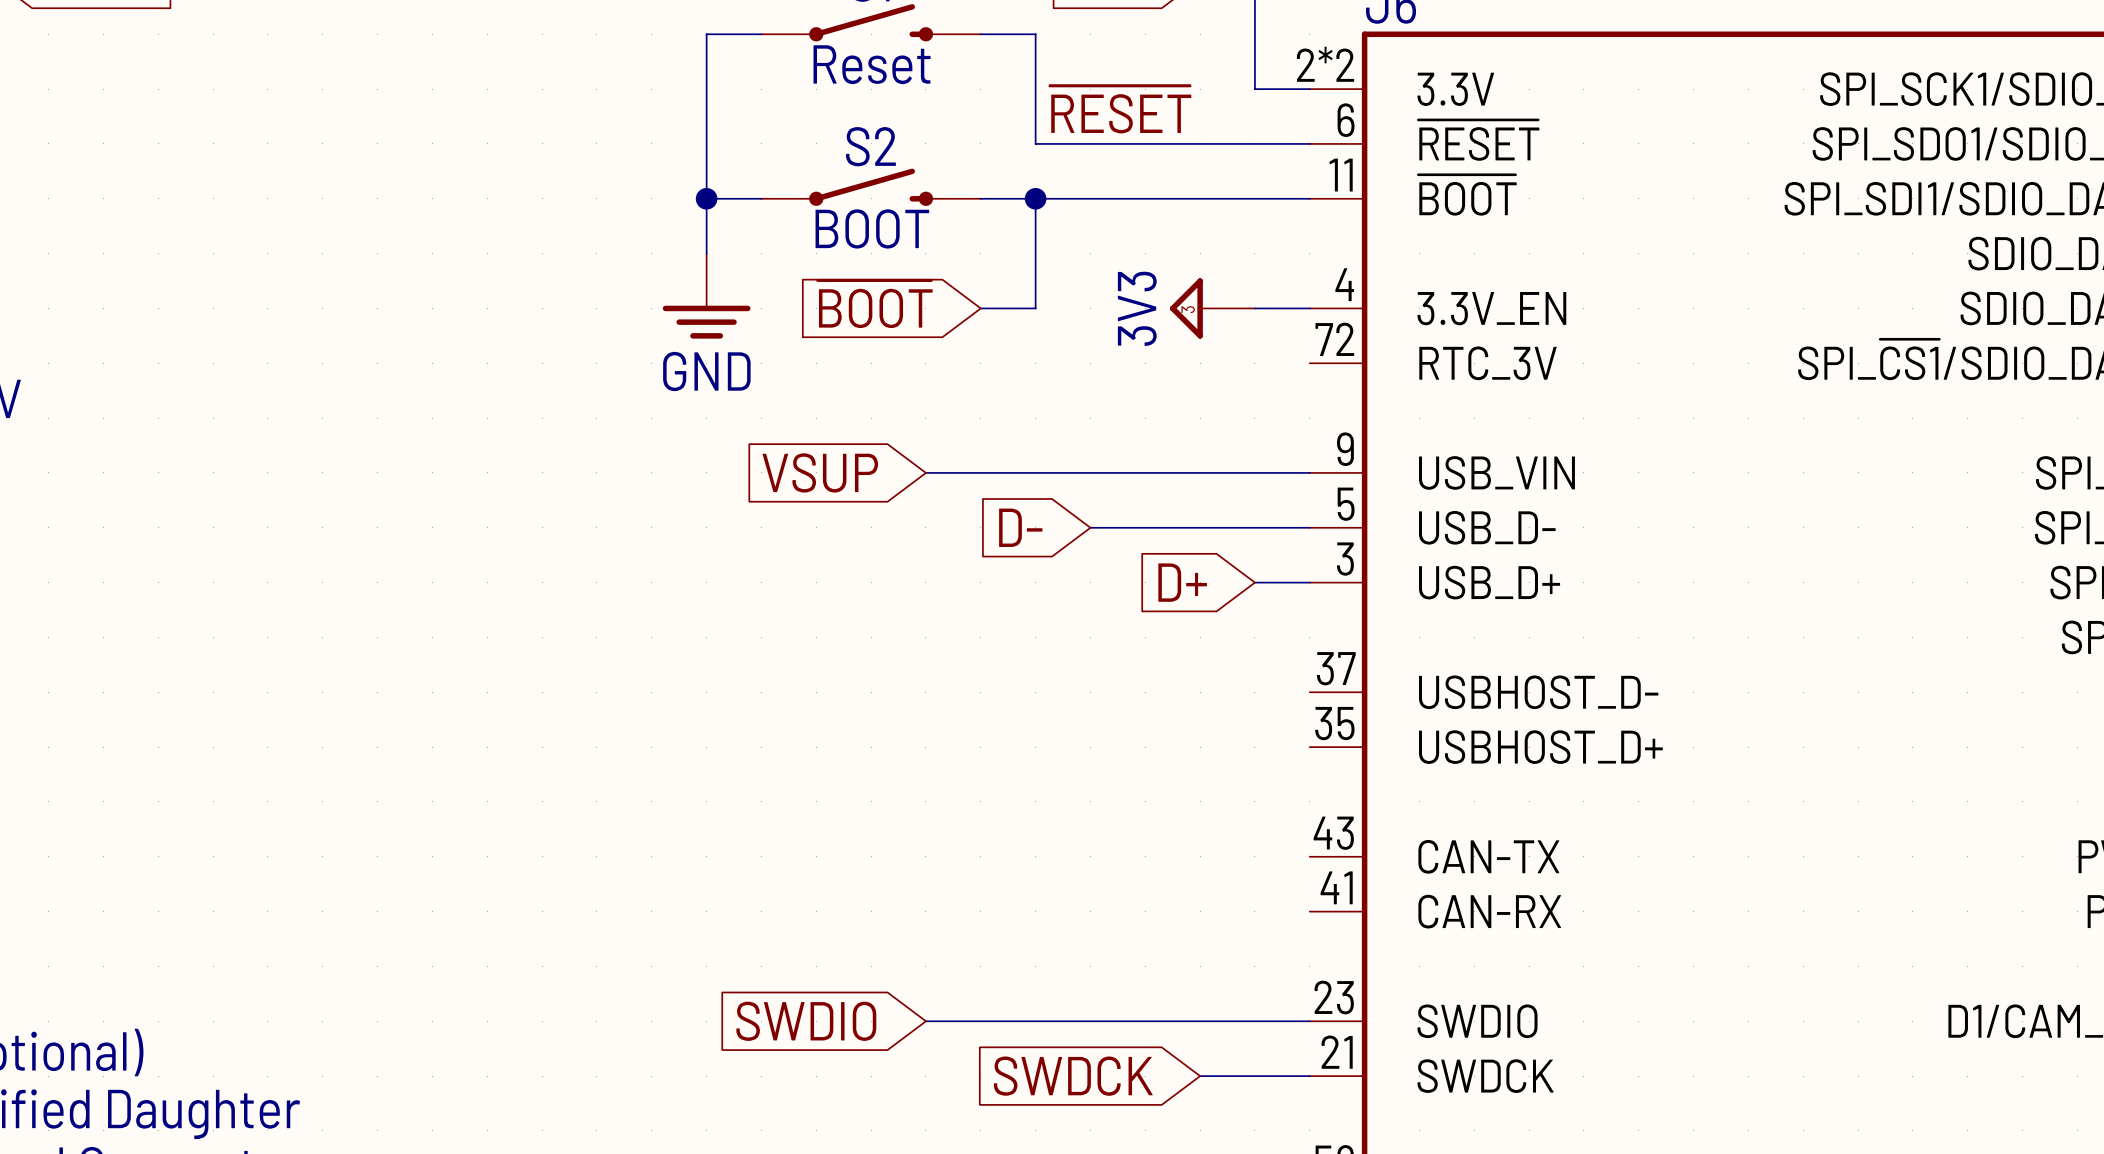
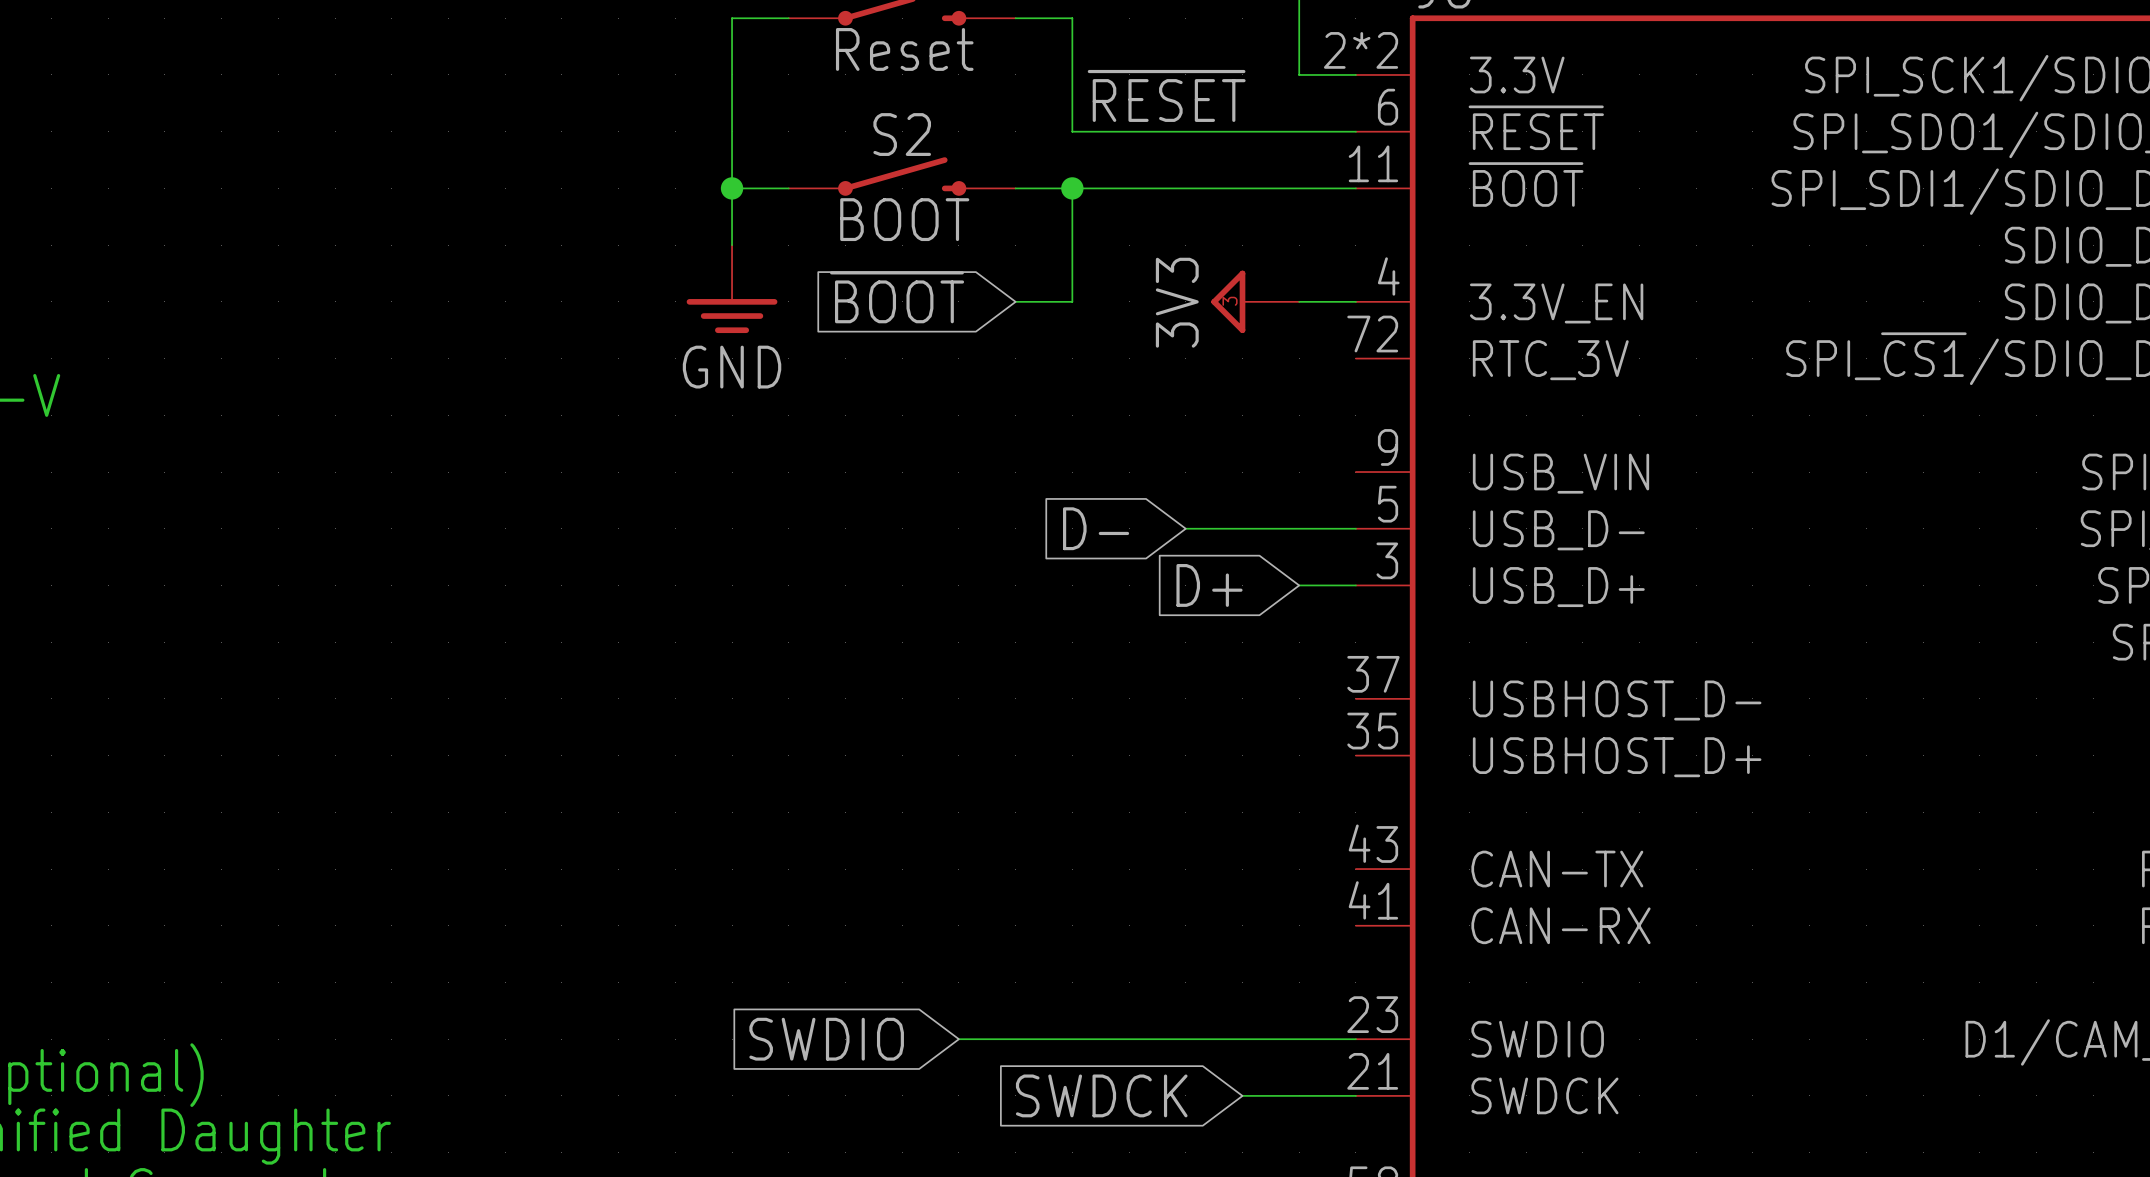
global label: VSUP (820, 472) -> none
wire: (925, 472) (1309, 472) -> none
global label position: D- (1020, 527) -> D- (1096, 528)
wire: (1090, 527) (1145, 527) -> none

